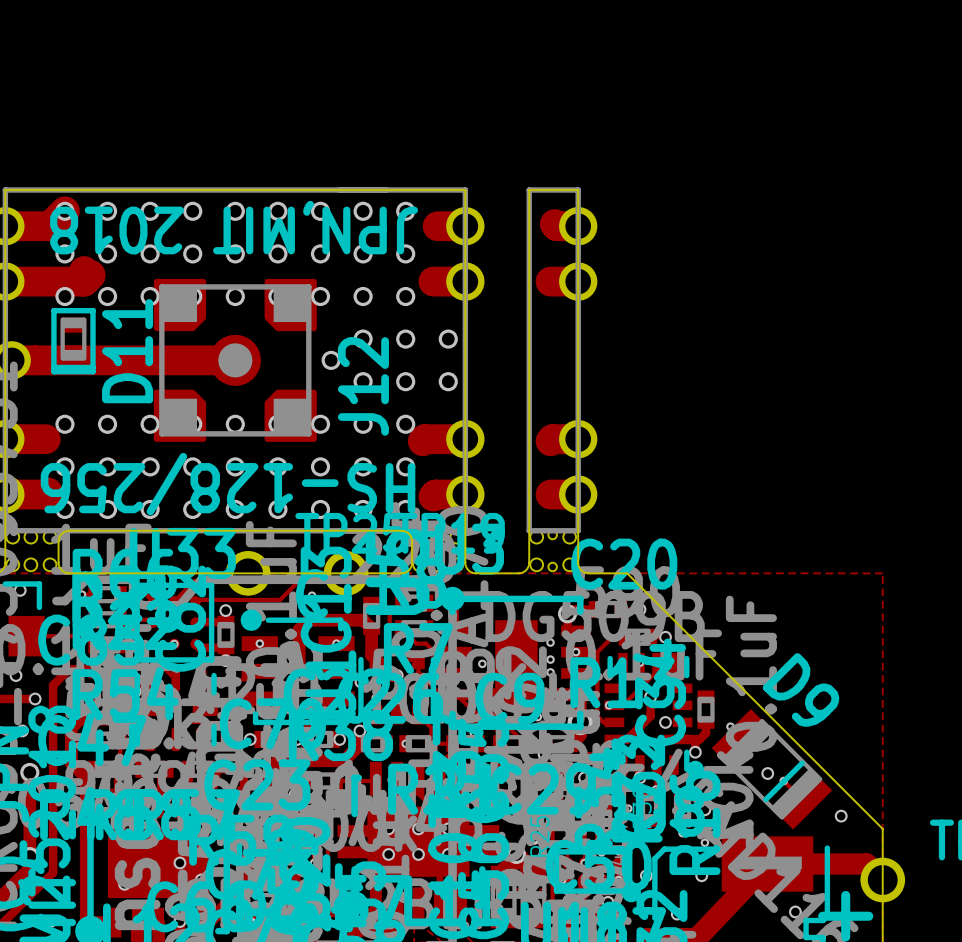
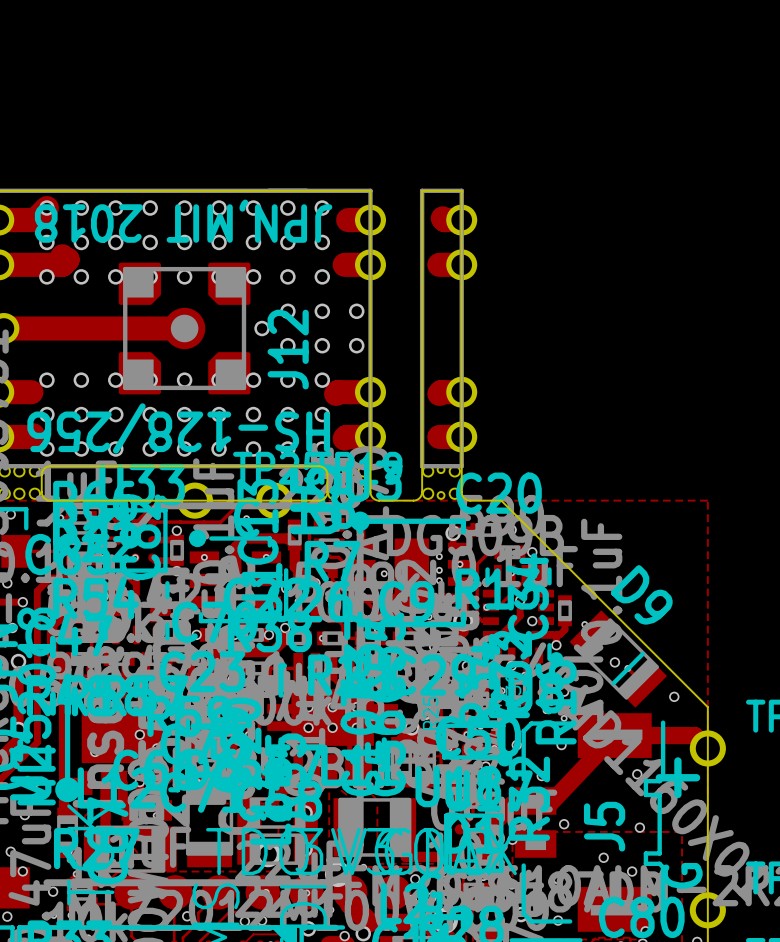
D11: (73, 341) -> none

